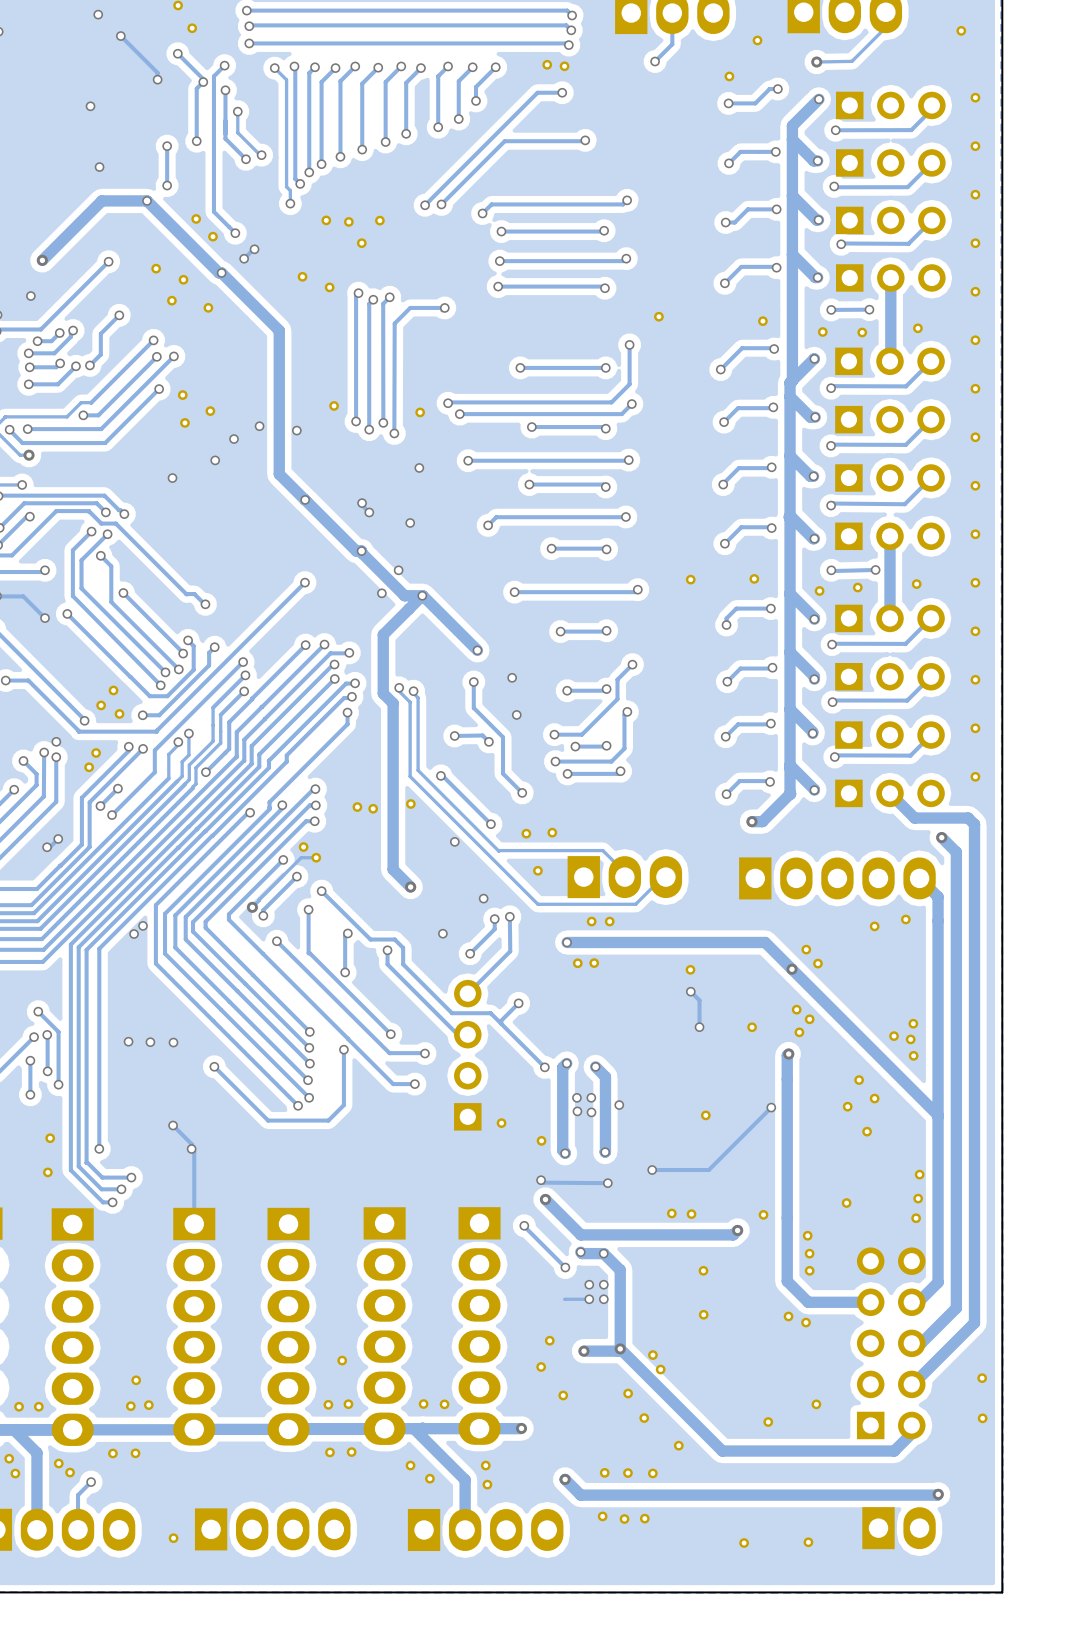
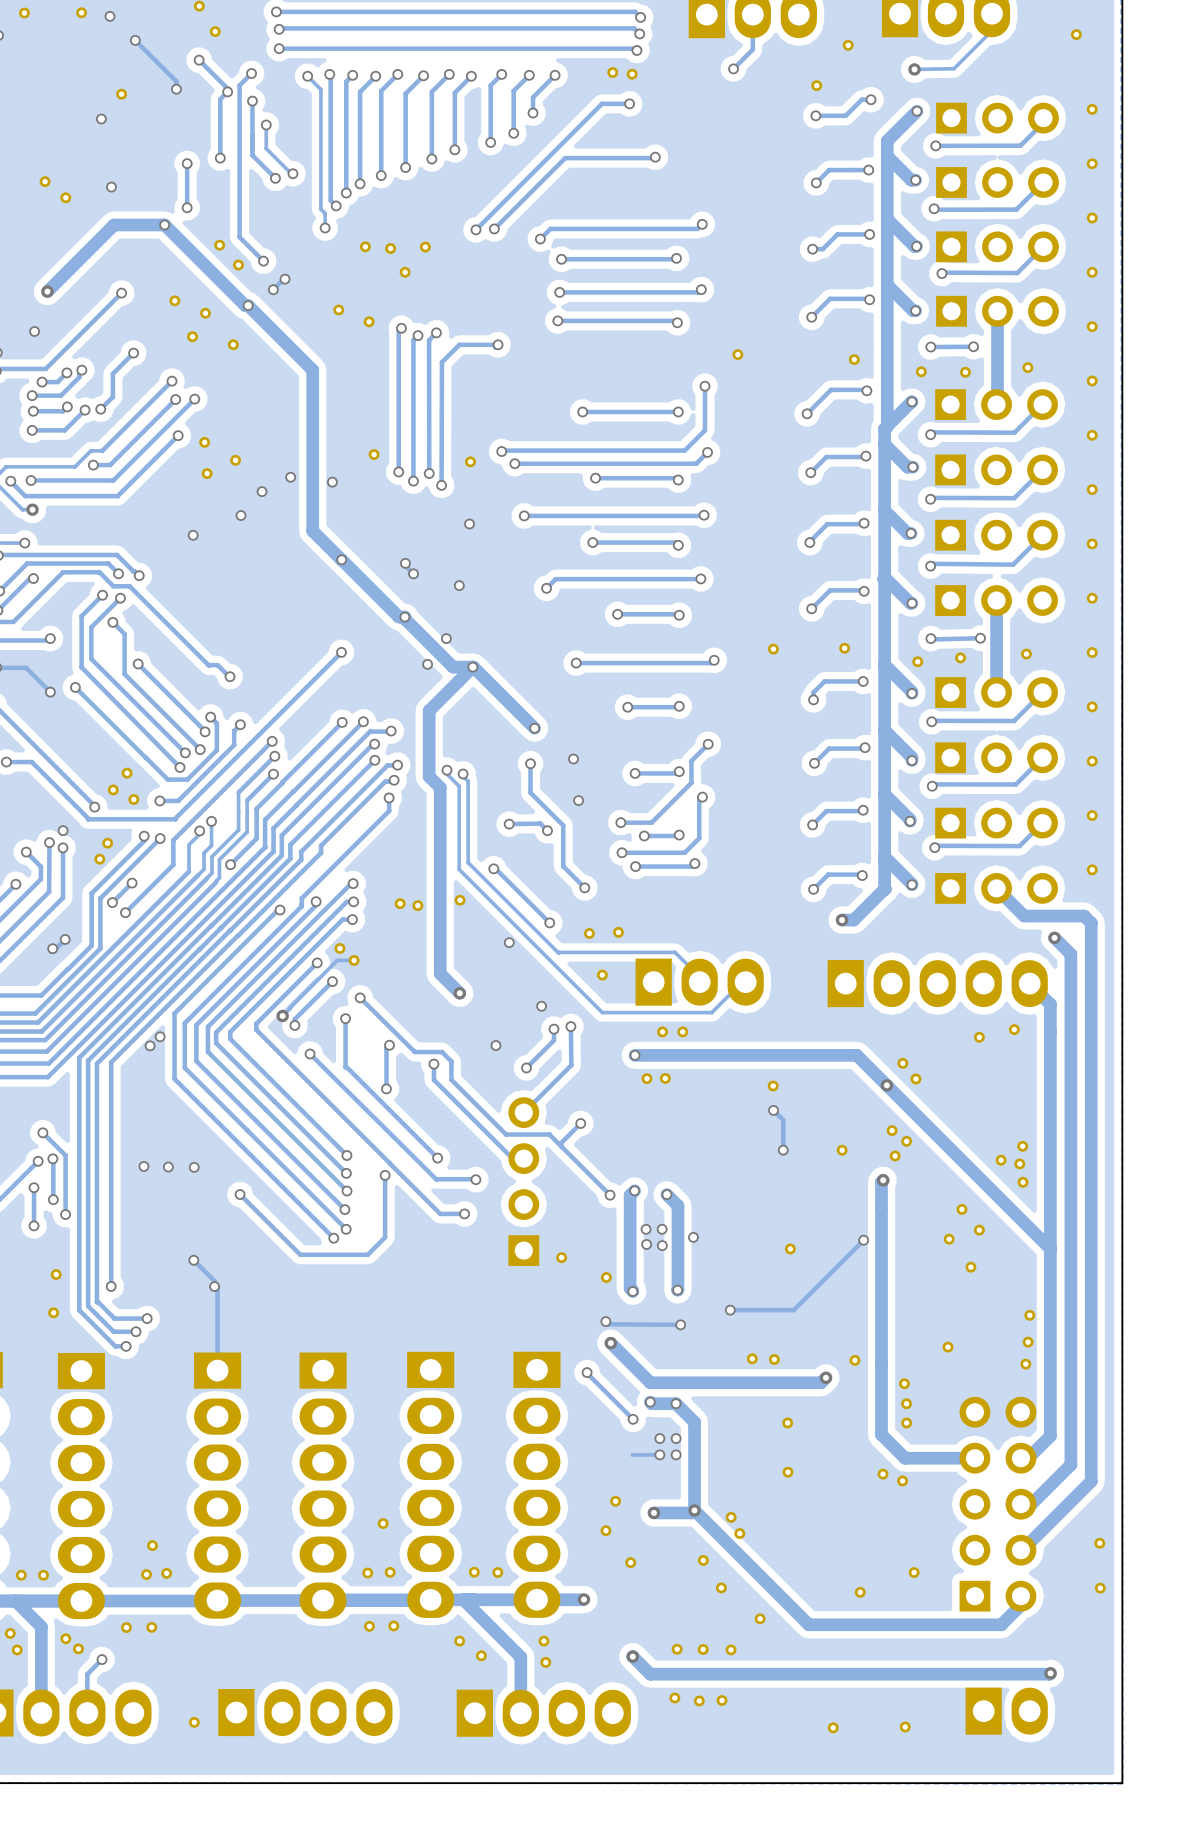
part: none -> (24, 13)
part: none -> (81, 12)
part: none -> (121, 94)
part: none -> (45, 181)
part: none -> (65, 197)

